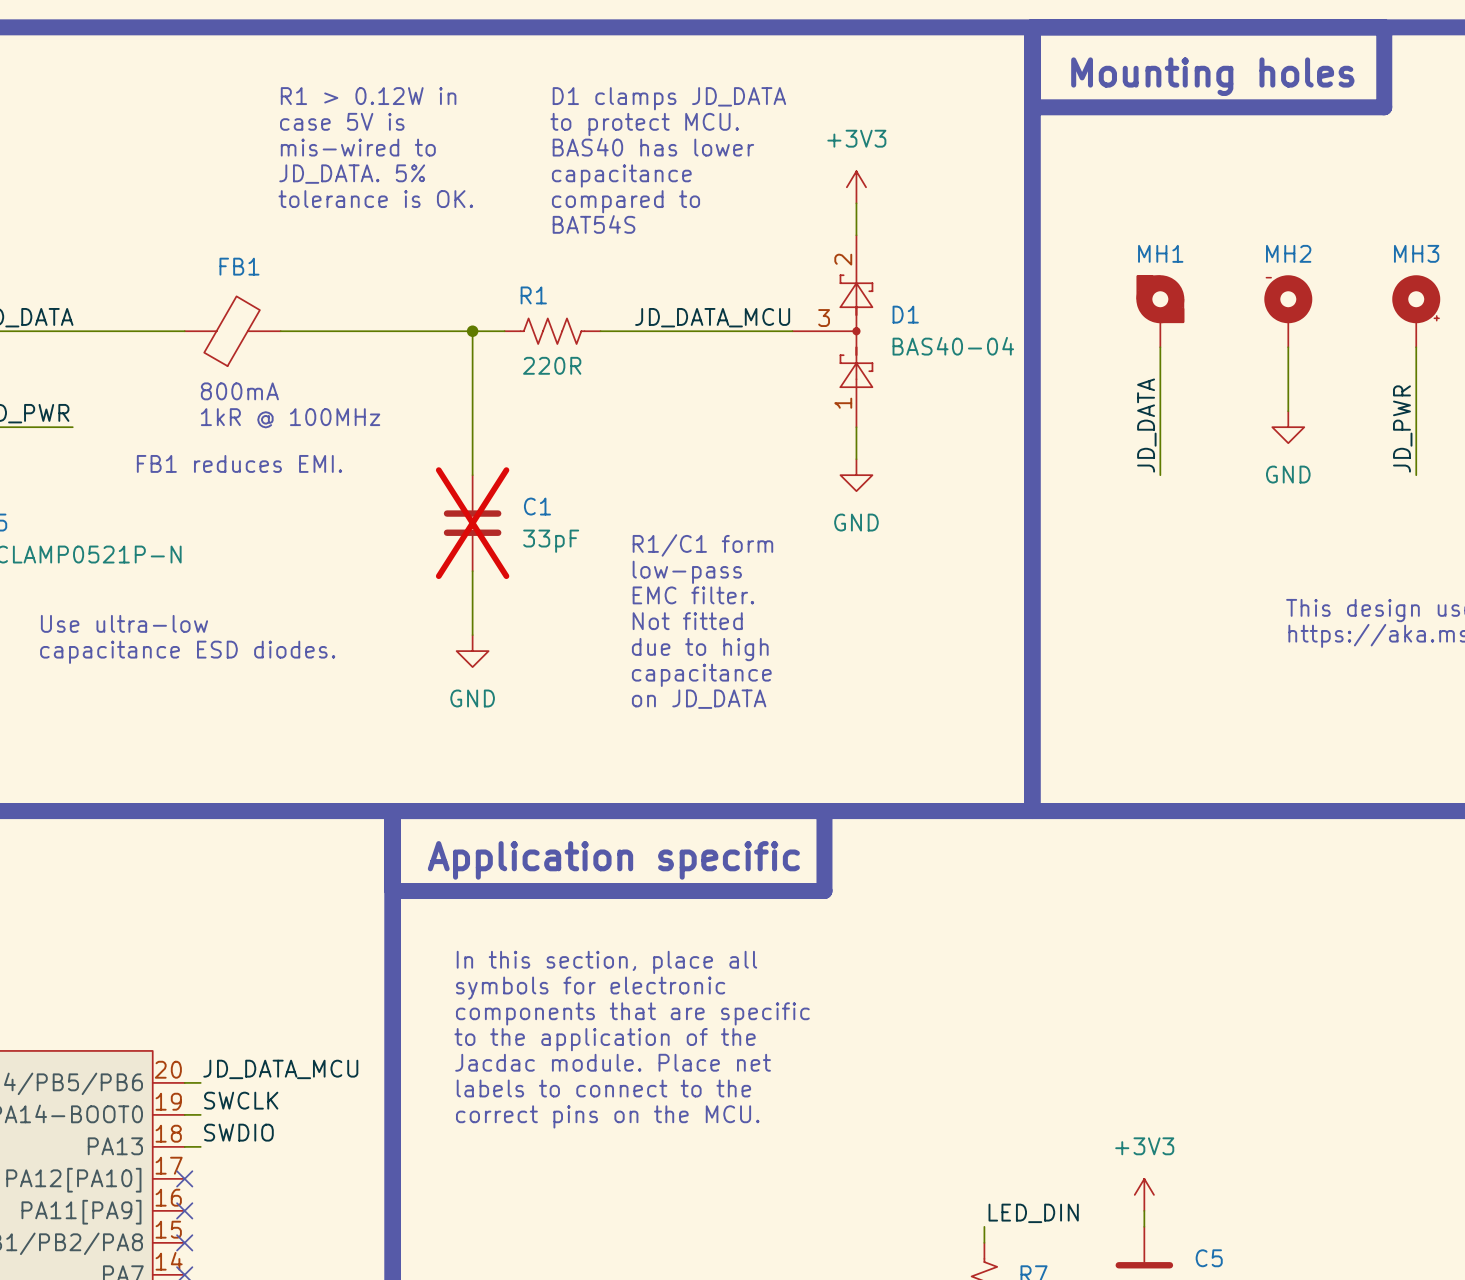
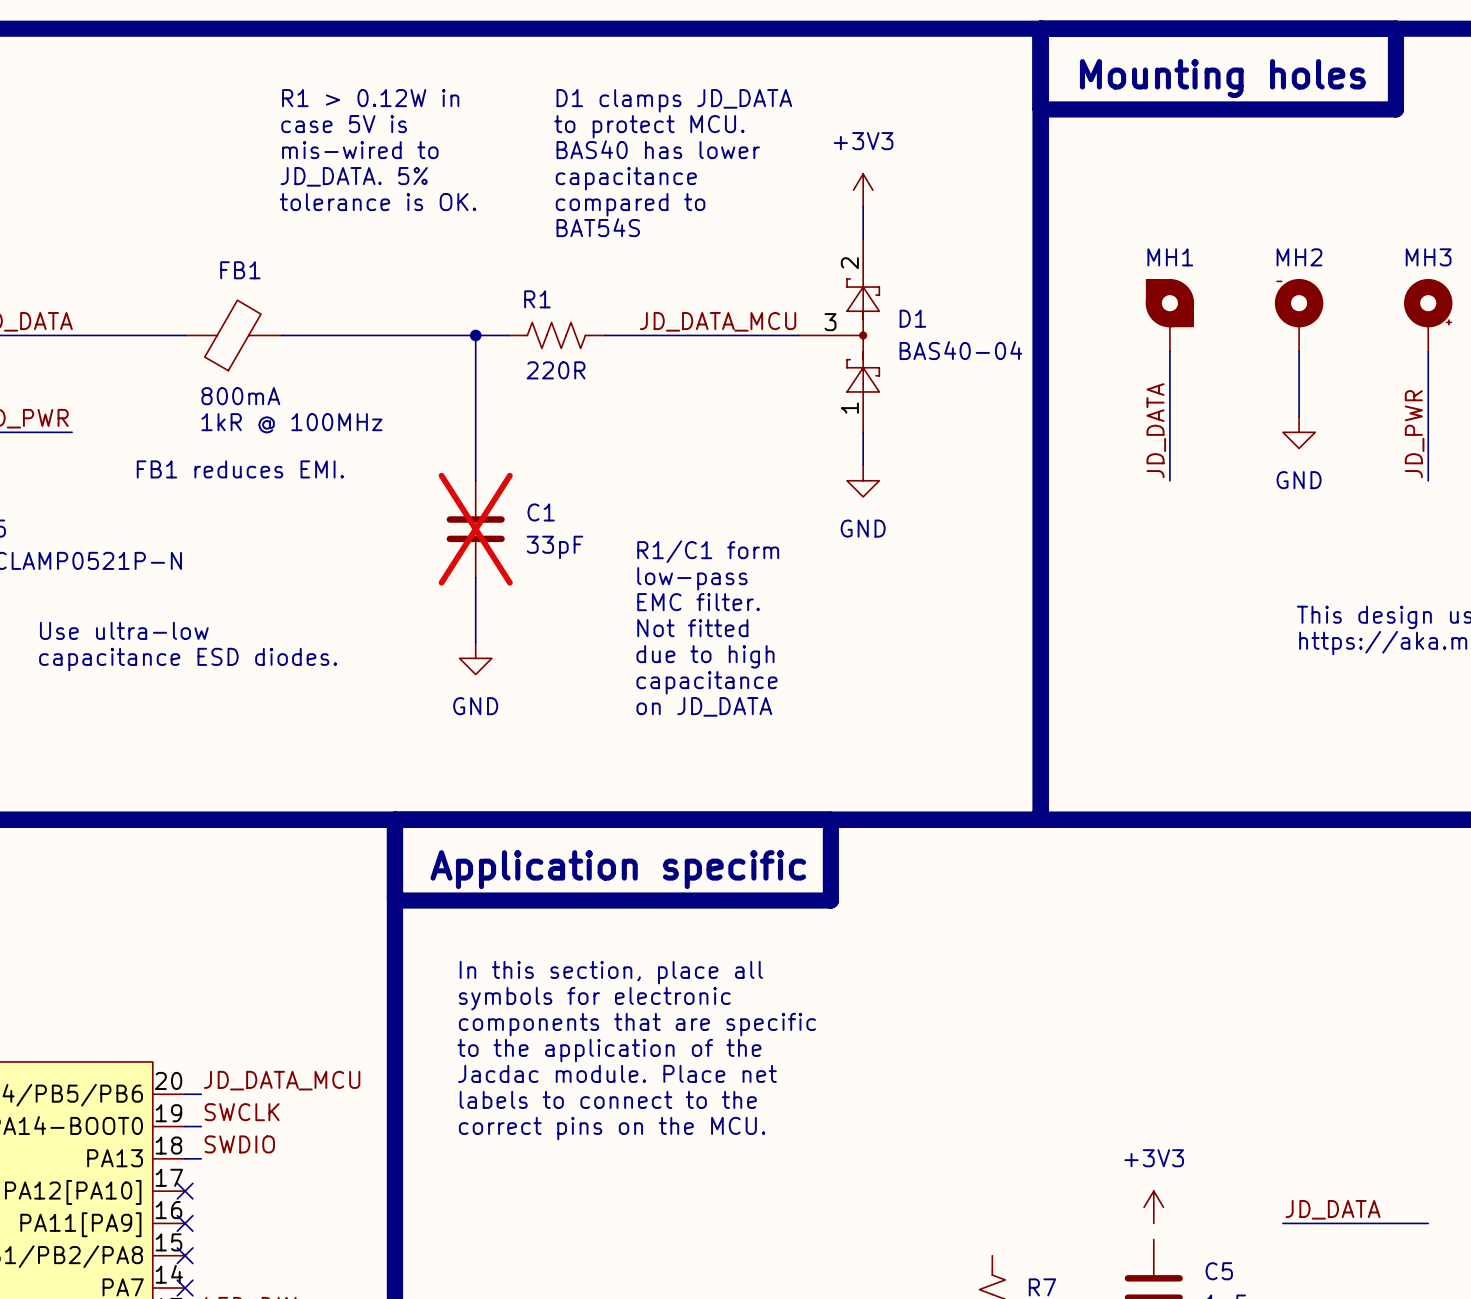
label: none -> JD_DATA (1333, 1209)
wire: (1144, 1210) (1144, 1226) -> none
wire: none -> (1282, 1223) (1428, 1223)
label: LED_DIN (1033, 1213) -> none
wire: (984, 1226) (984, 1242) -> none

